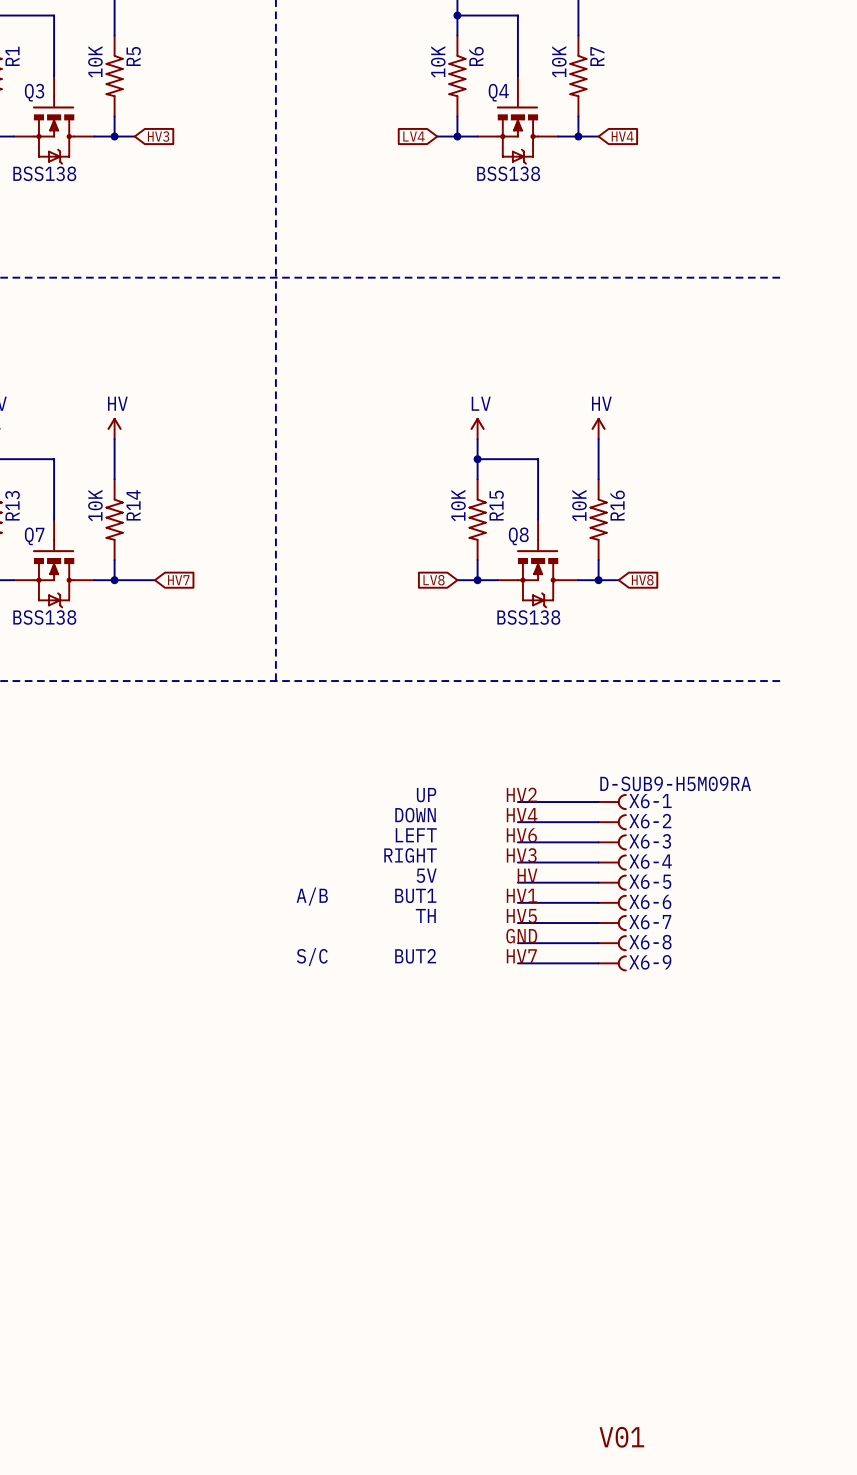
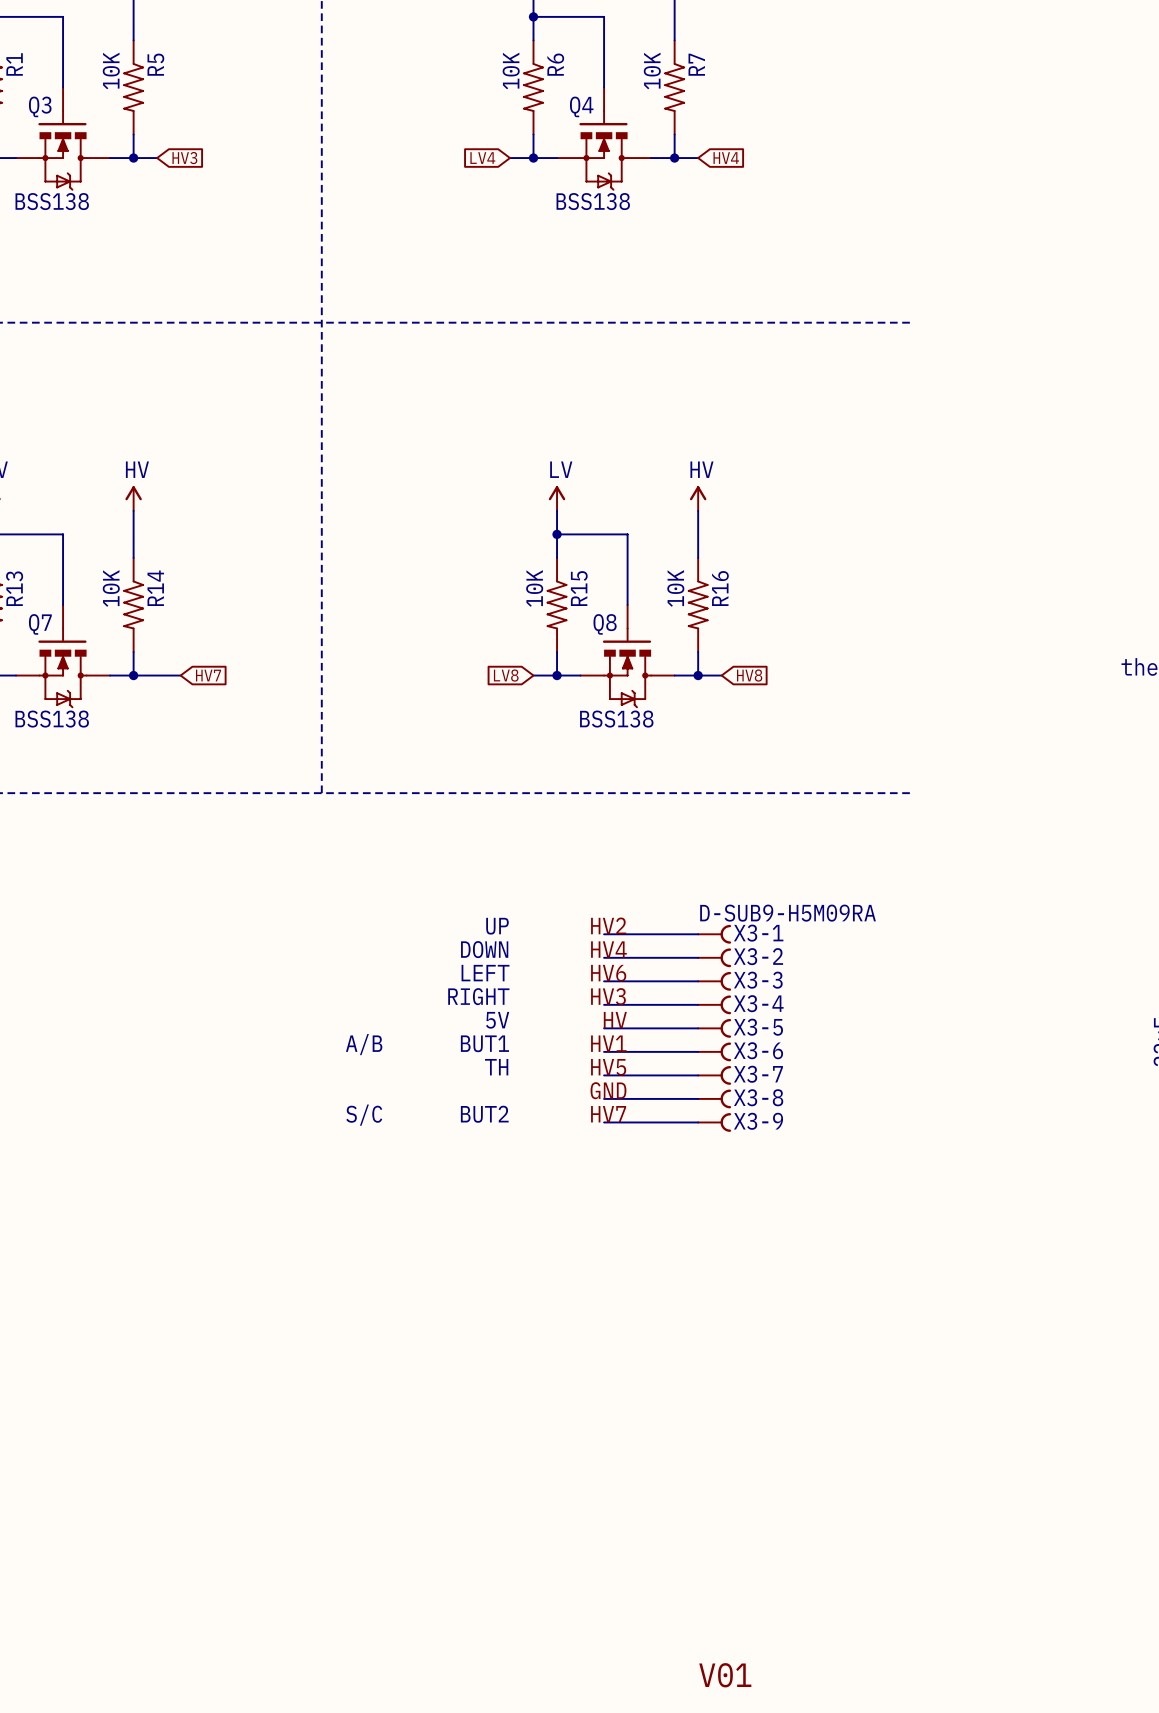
X6-1 name: X6-1 (650, 801) -> X3-1 (758, 933)
X6-2 name: X6-2 (650, 821) -> X3-2 (758, 956)
X6-3 name: X6-3 (650, 841) -> X3-3 (758, 980)
X6-4 name: X6-4 (650, 861) -> X3-4 (758, 1003)
X6-5 name: X6-5 (650, 881) -> X3-5 (758, 1027)
X6-6 name: X6-6 (650, 901) -> X3-6 (758, 1050)
X6-7 name: X6-7 (650, 922) -> X3-7 (758, 1074)
X6-8 name: X6-8 (650, 942) -> X3-8 (758, 1097)
X6-9 name: X6-9 (650, 962) -> X3-9 (758, 1121)

